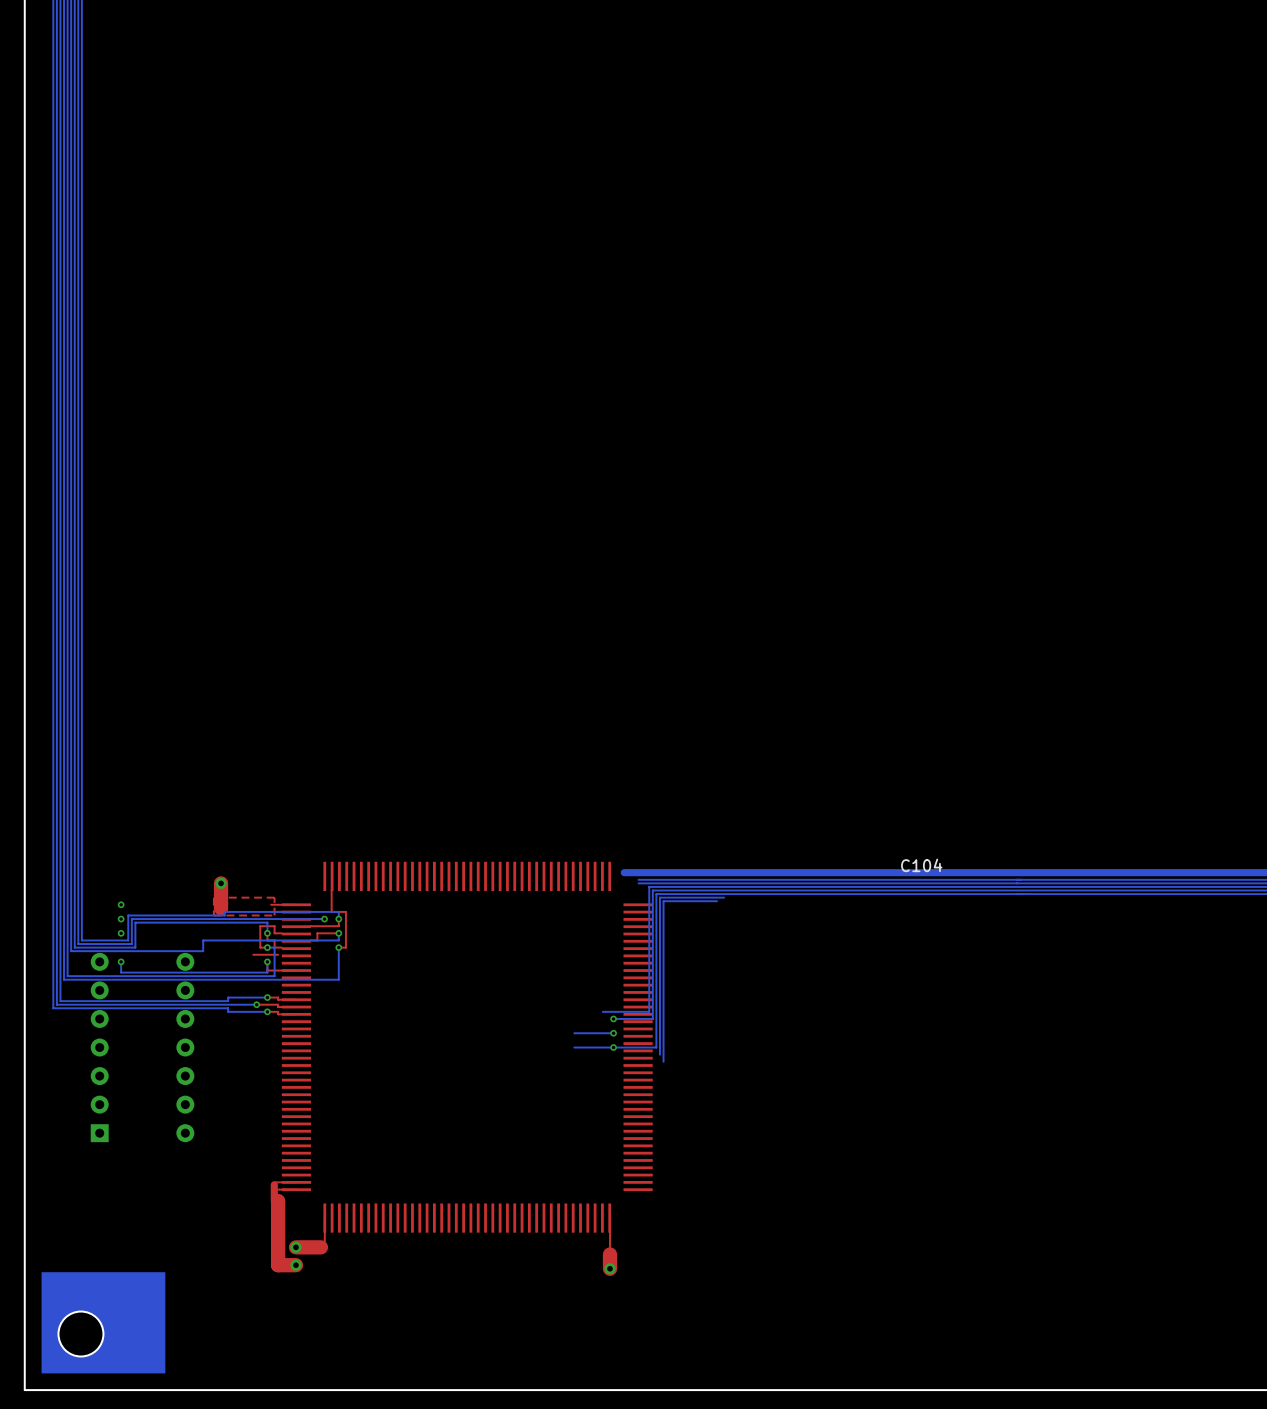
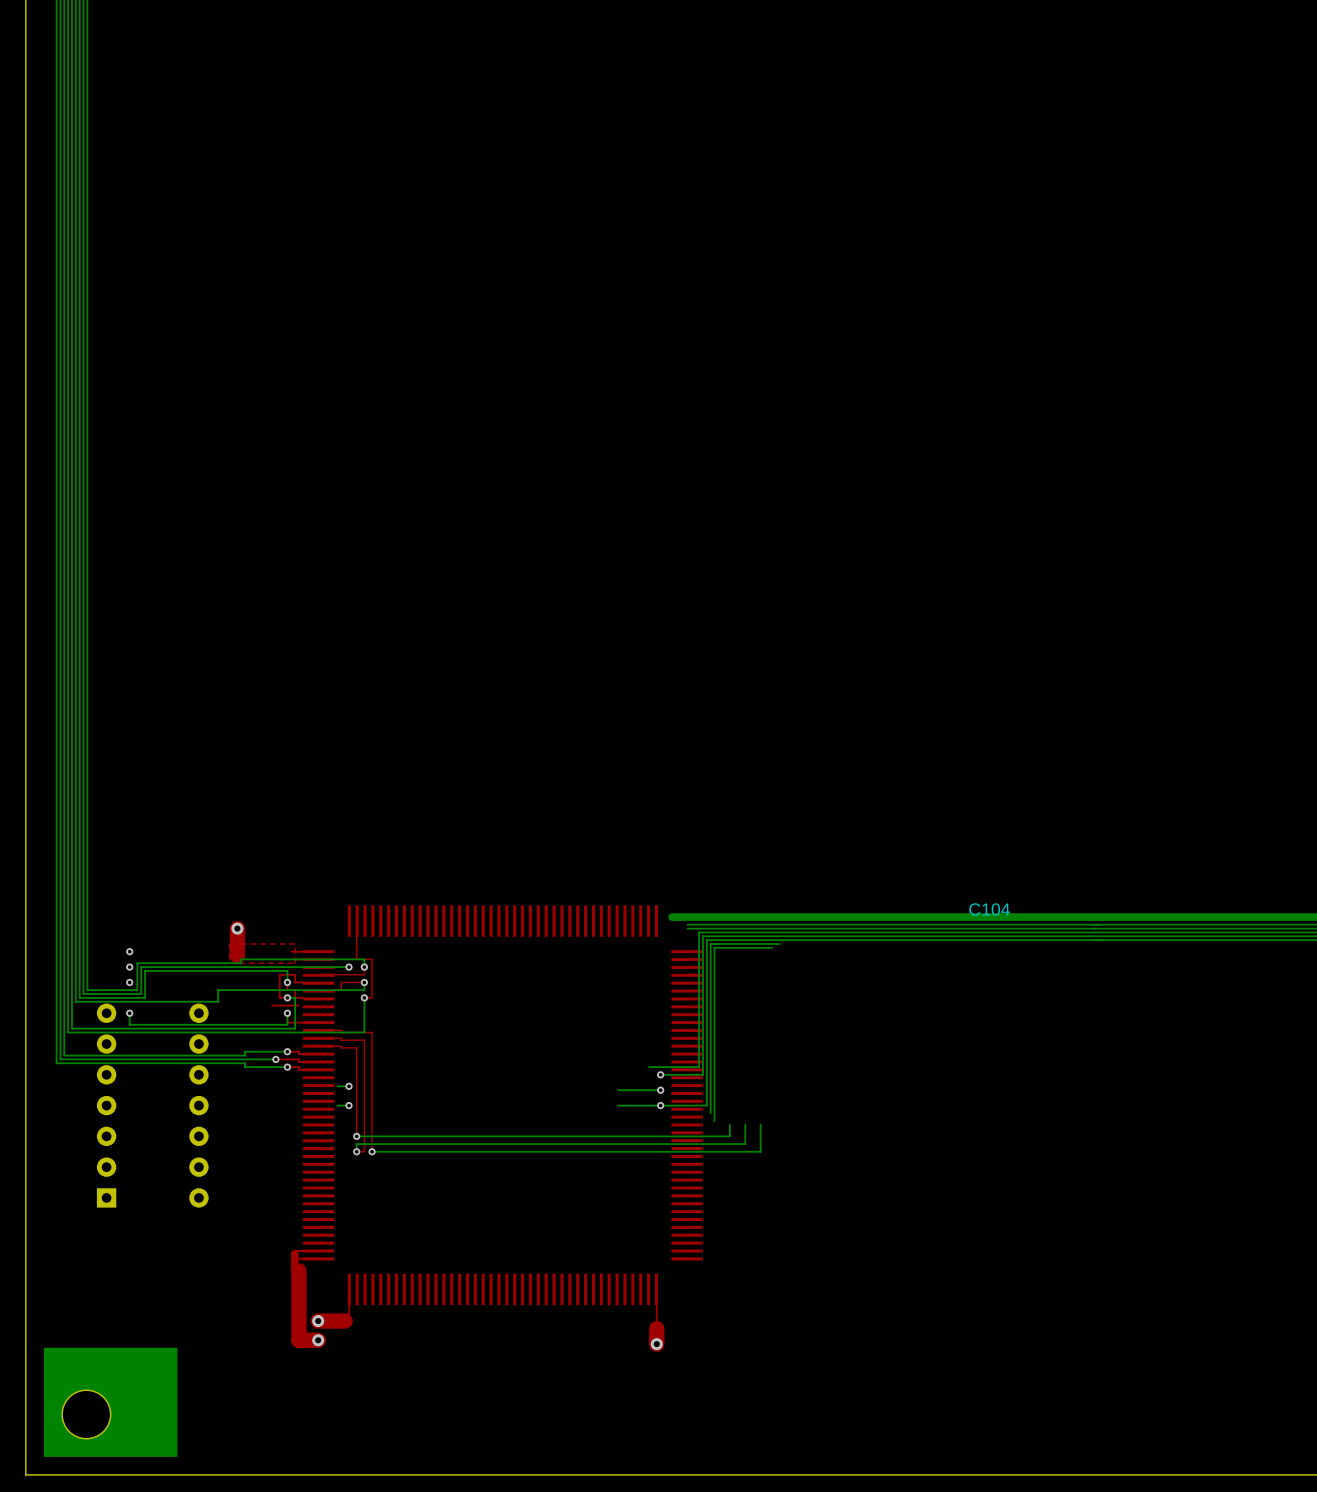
top track: none -> (318, 1030) (372, 1032) (372, 1151)
top track: none -> (318, 1038) (364, 1040) (364, 1151) (356, 1151)
top track: none -> (318, 1046) (356, 1047) (356, 1136)
bottom track: none -> (348, 1086) (337, 1086)
via: none -> (348, 1086)
bottom track: none -> (348, 1105) (337, 1105)
via: none -> (348, 1105)
bottom track: none -> (729, 1124) (729, 1136) (356, 1136)
bottom track: none -> (745, 1124) (745, 1144) (356, 1144) (356, 1151)
bottom track: none -> (760, 1124) (760, 1151) (372, 1151)
via: none -> (356, 1136)
via: none -> (356, 1151)
via: none -> (372, 1151)

